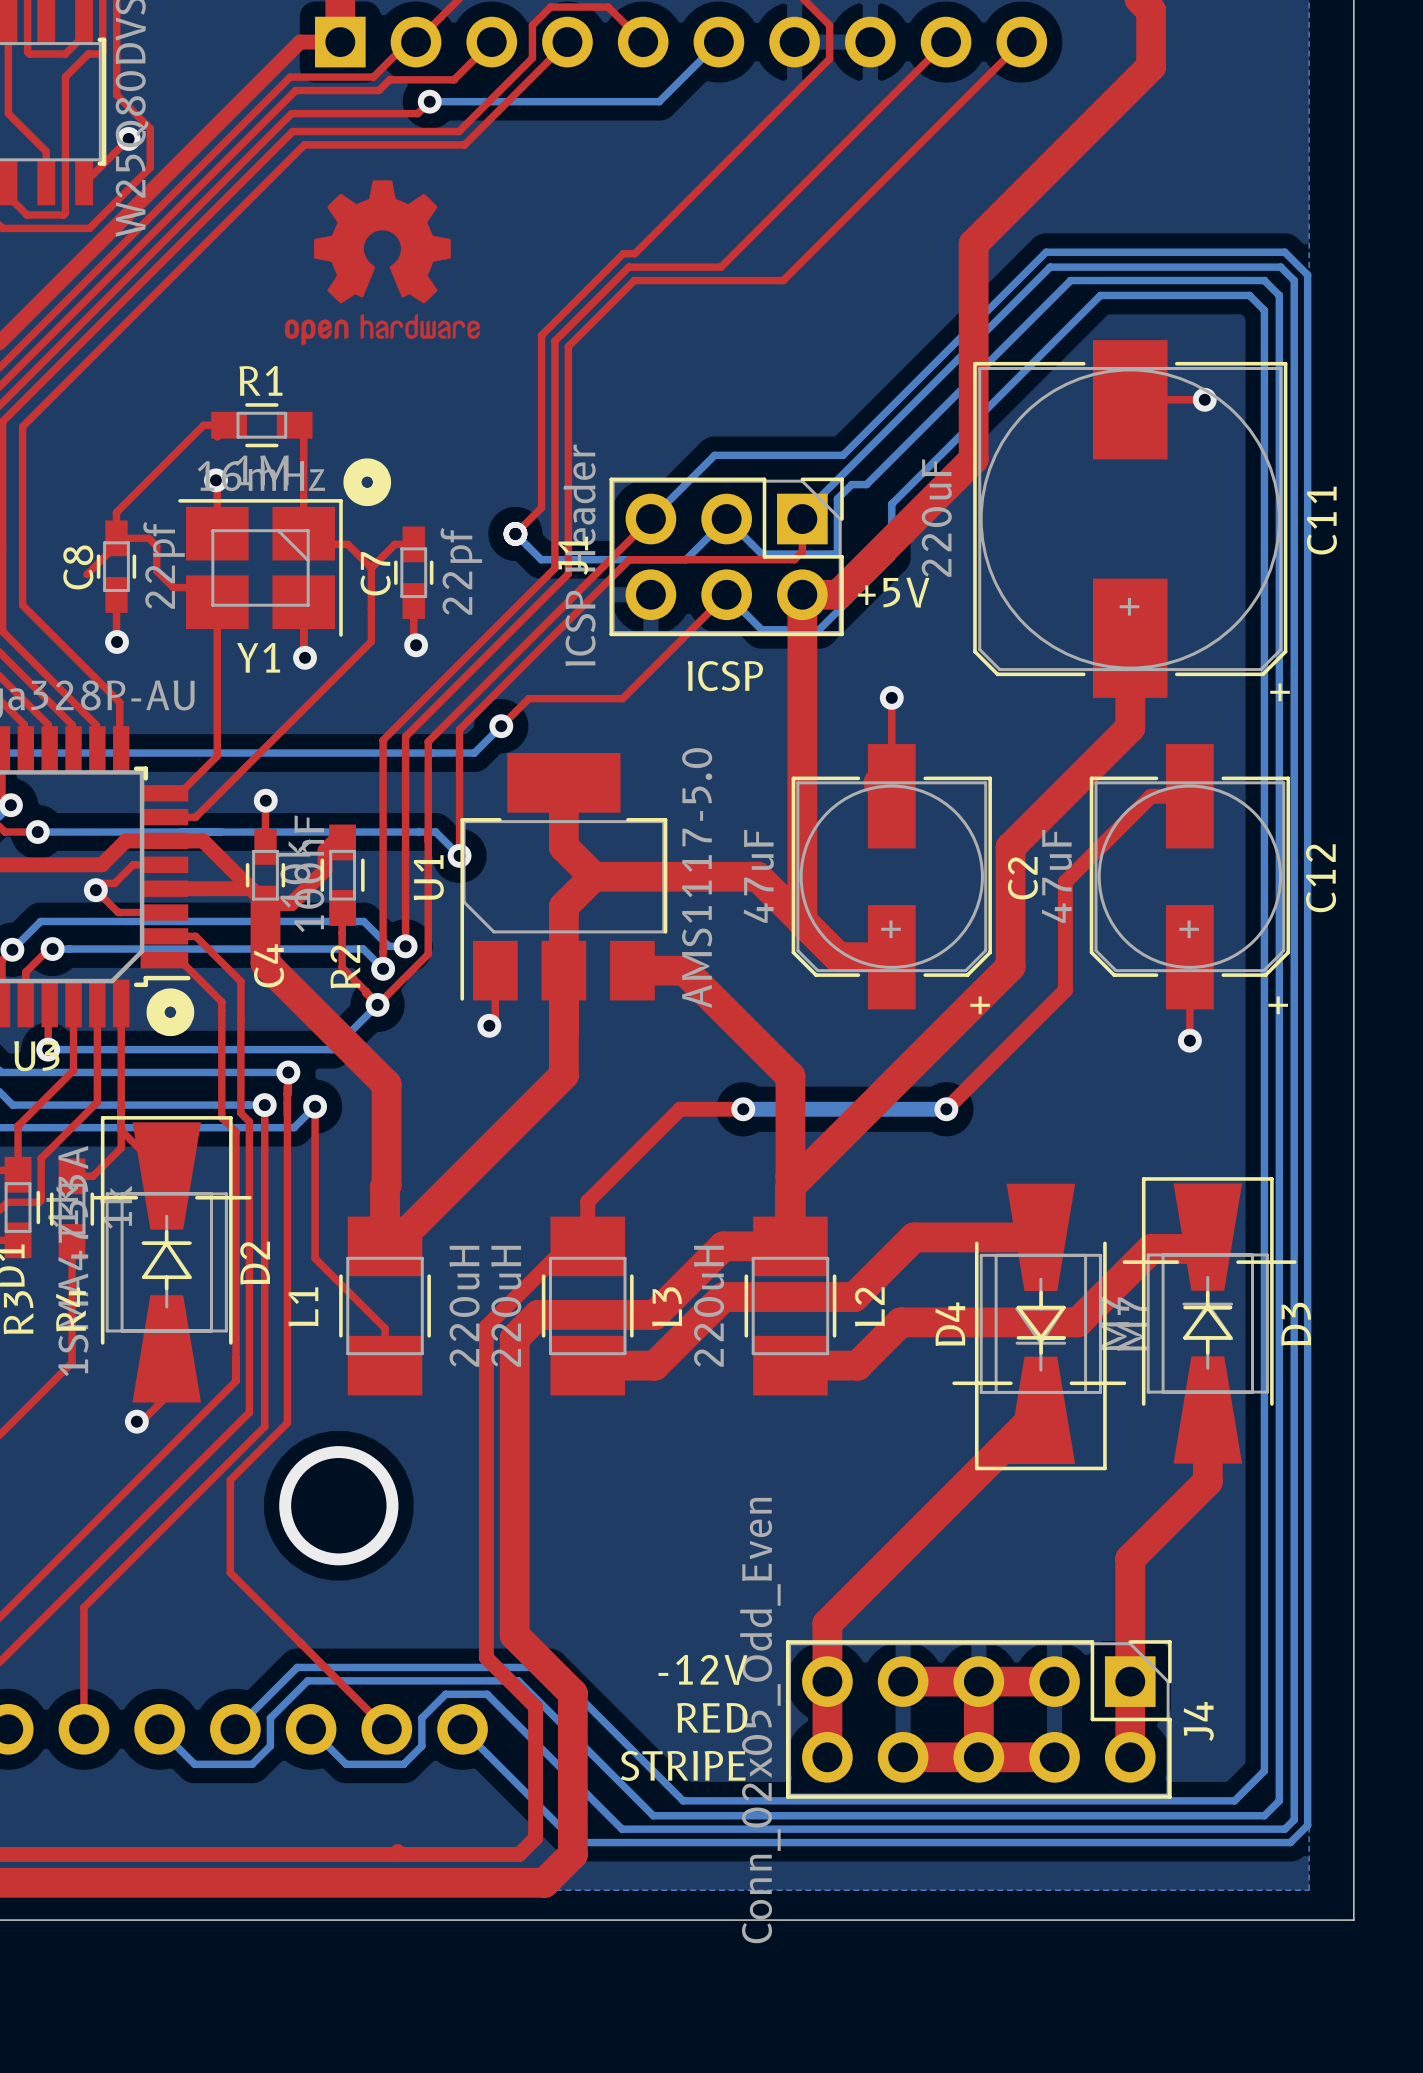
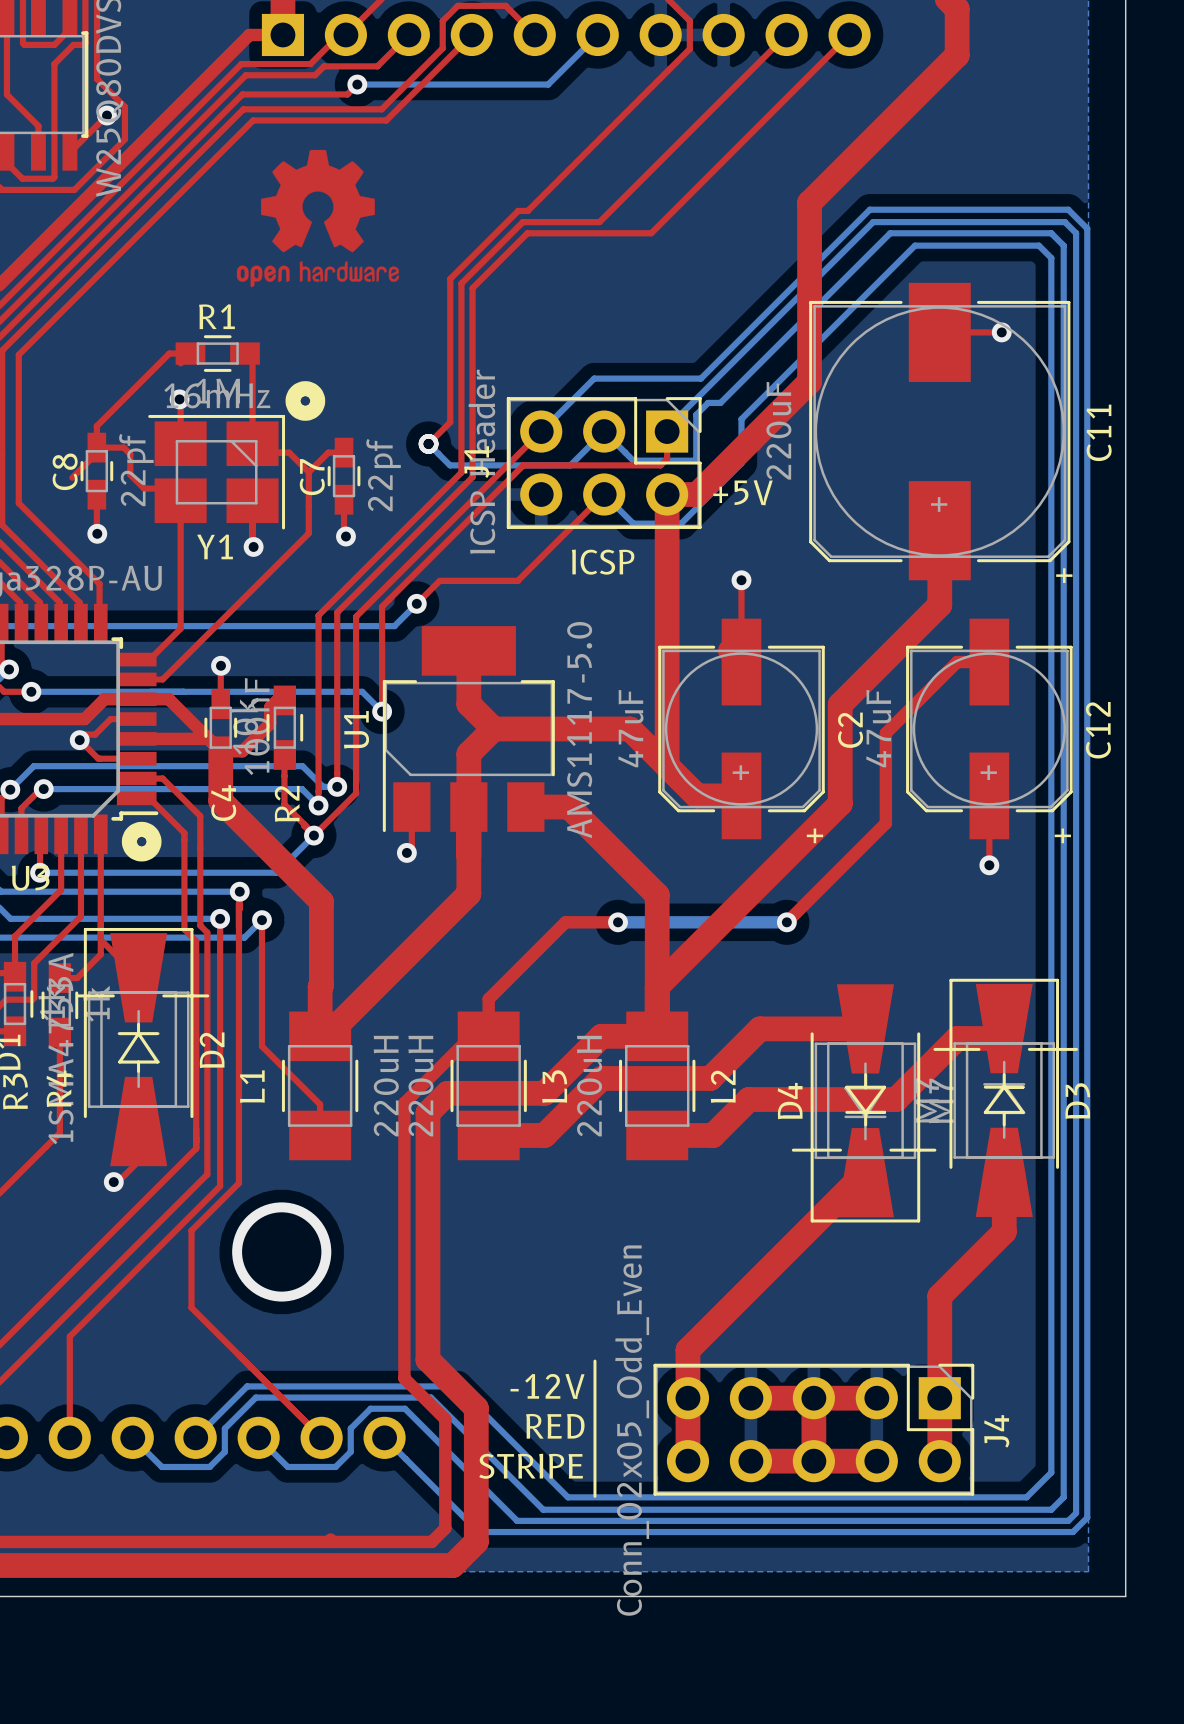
line: none -> (594, 1361) (594, 1496)
text position: -12V (703, 1669) -> -12V (547, 1386)
text position: RED (712, 1717) -> RED (555, 1426)
text position: STRIPE (683, 1765) -> STRIPE (531, 1466)

